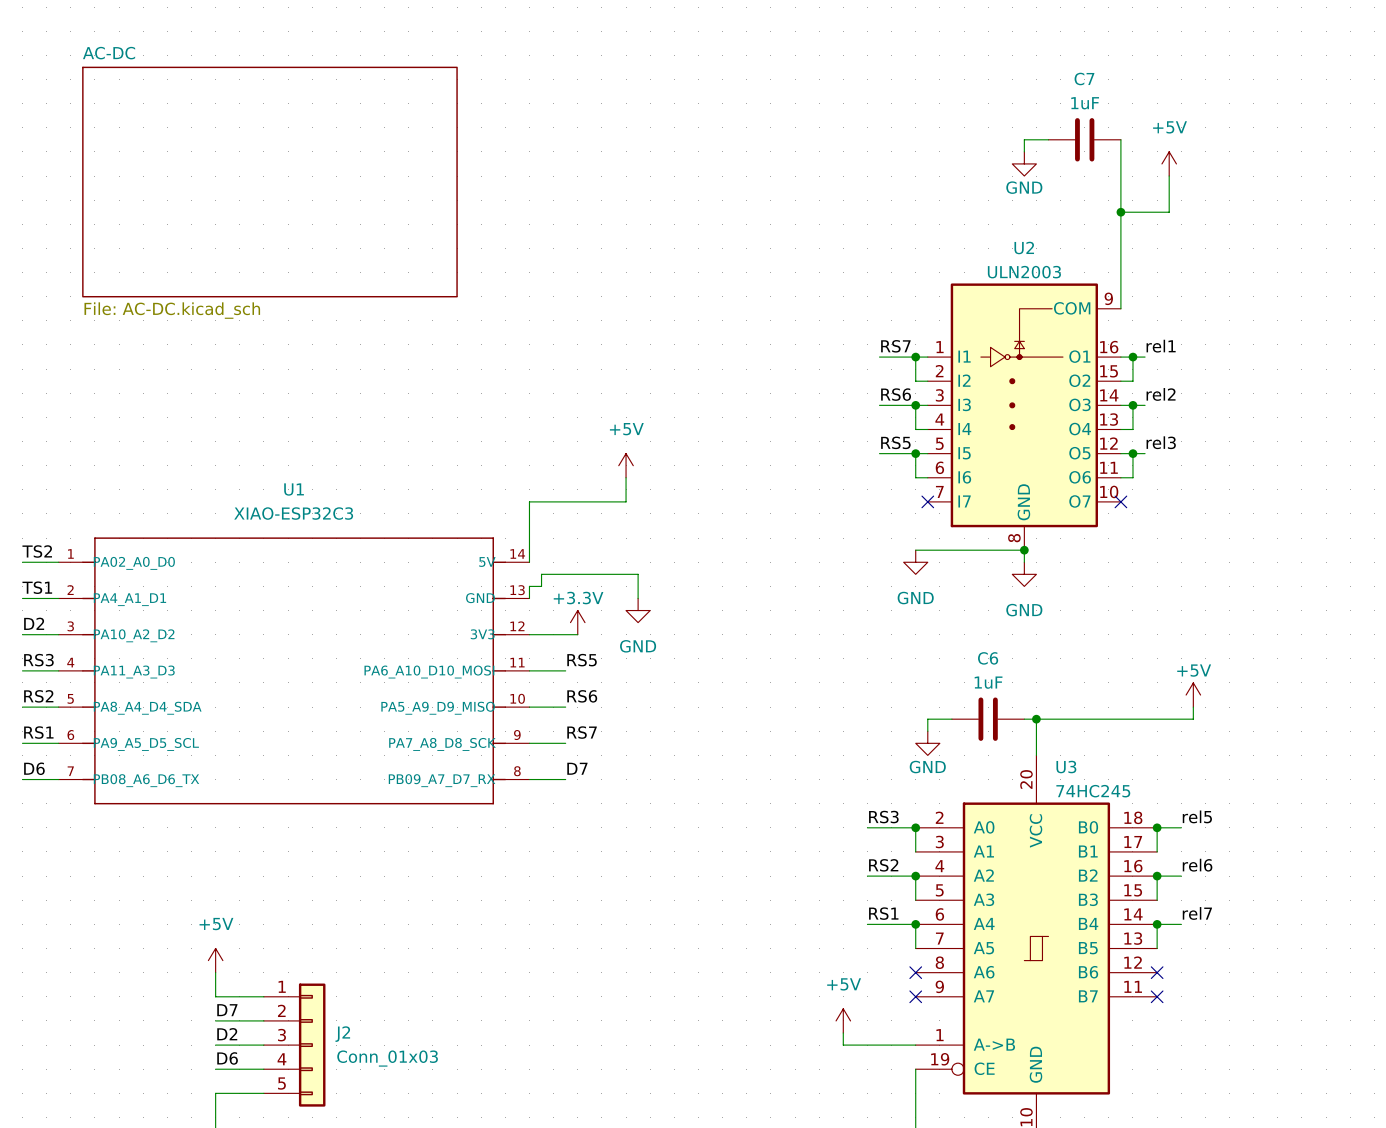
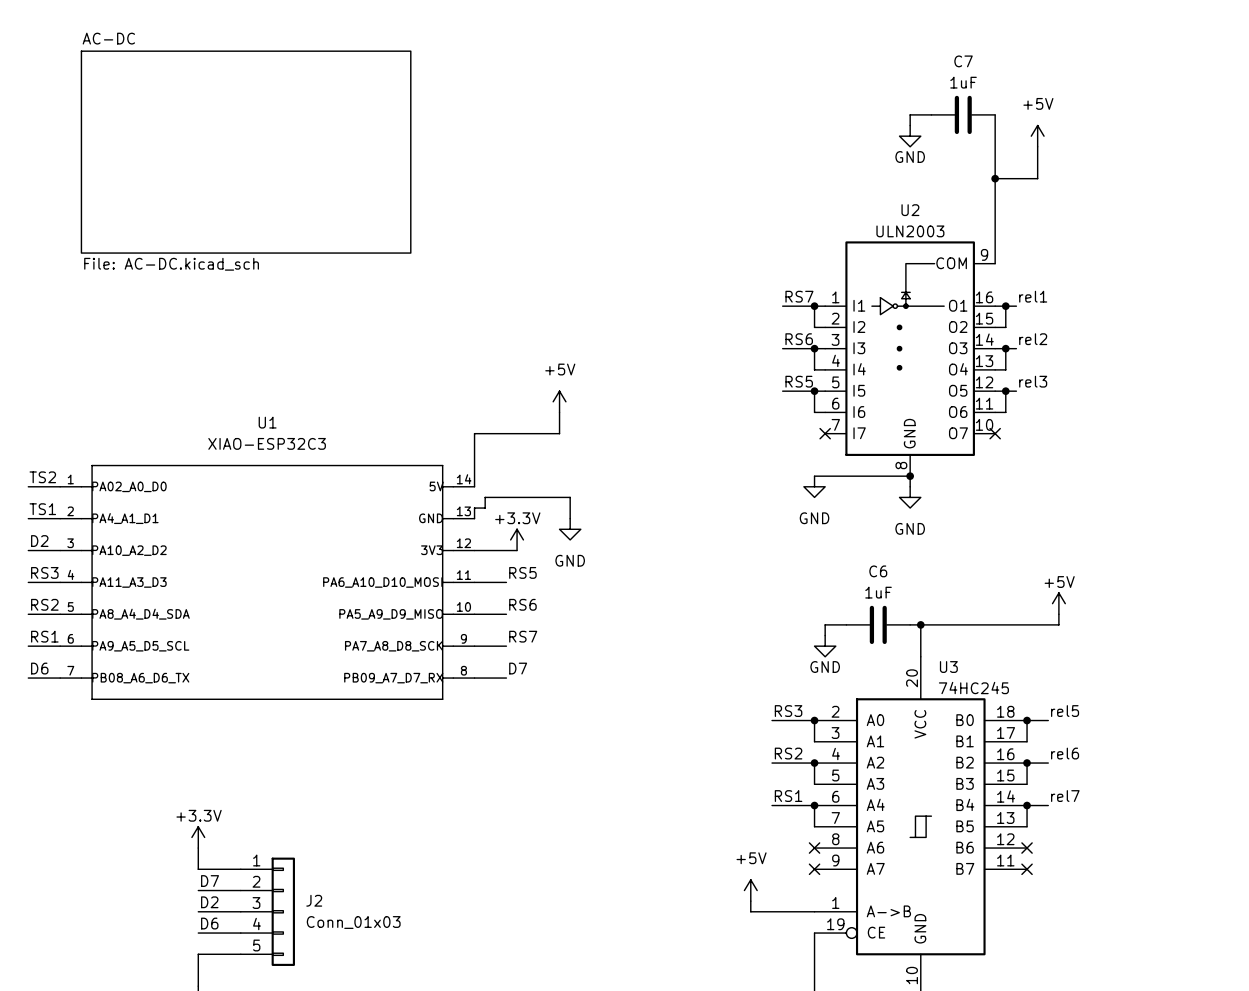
power symbol: +5V (215, 960) -> +3.3V (198, 837)

